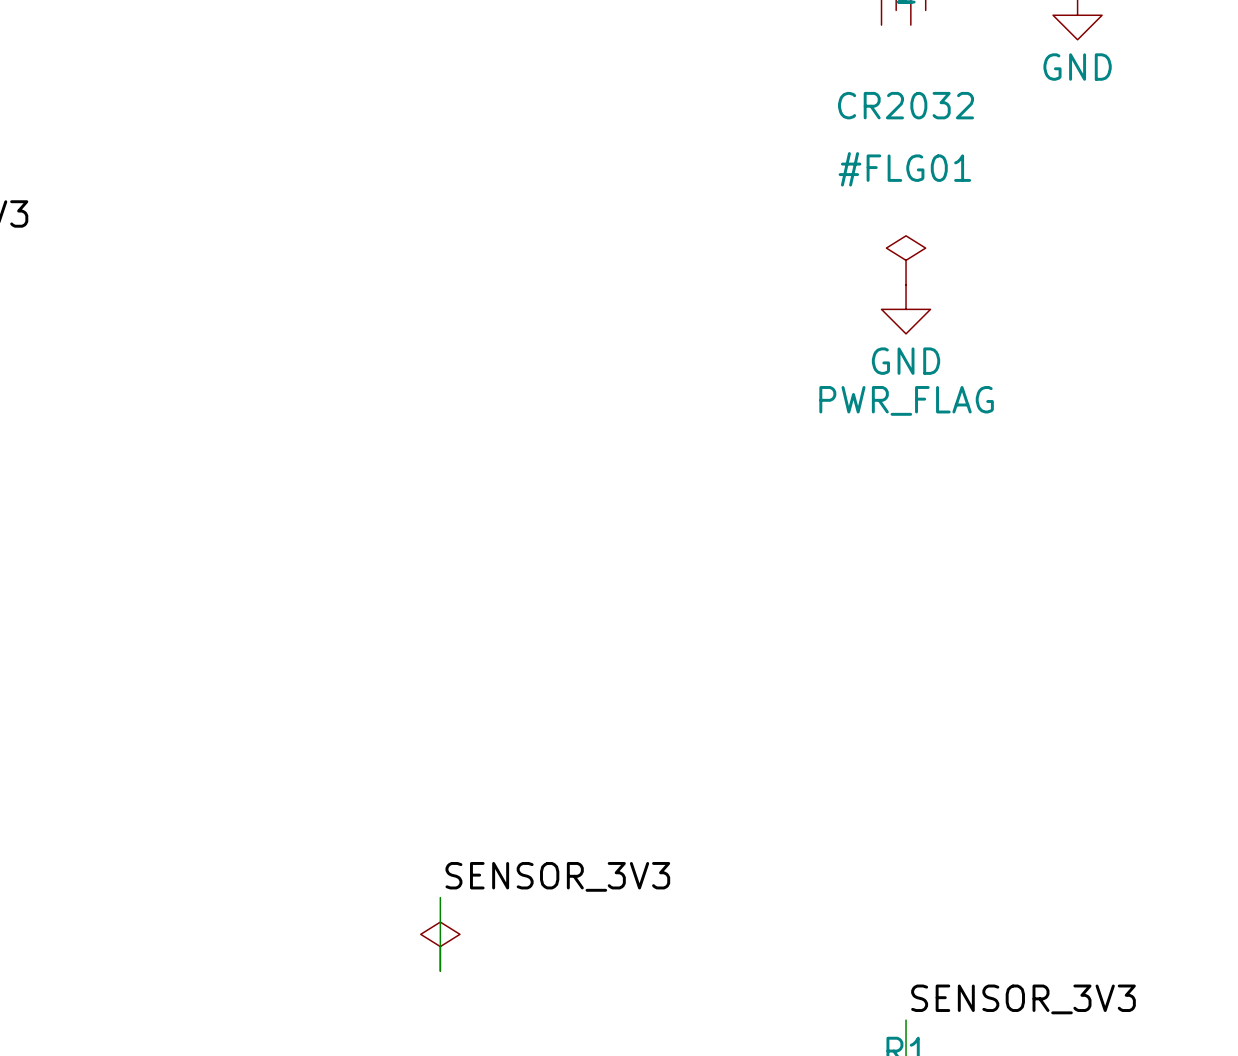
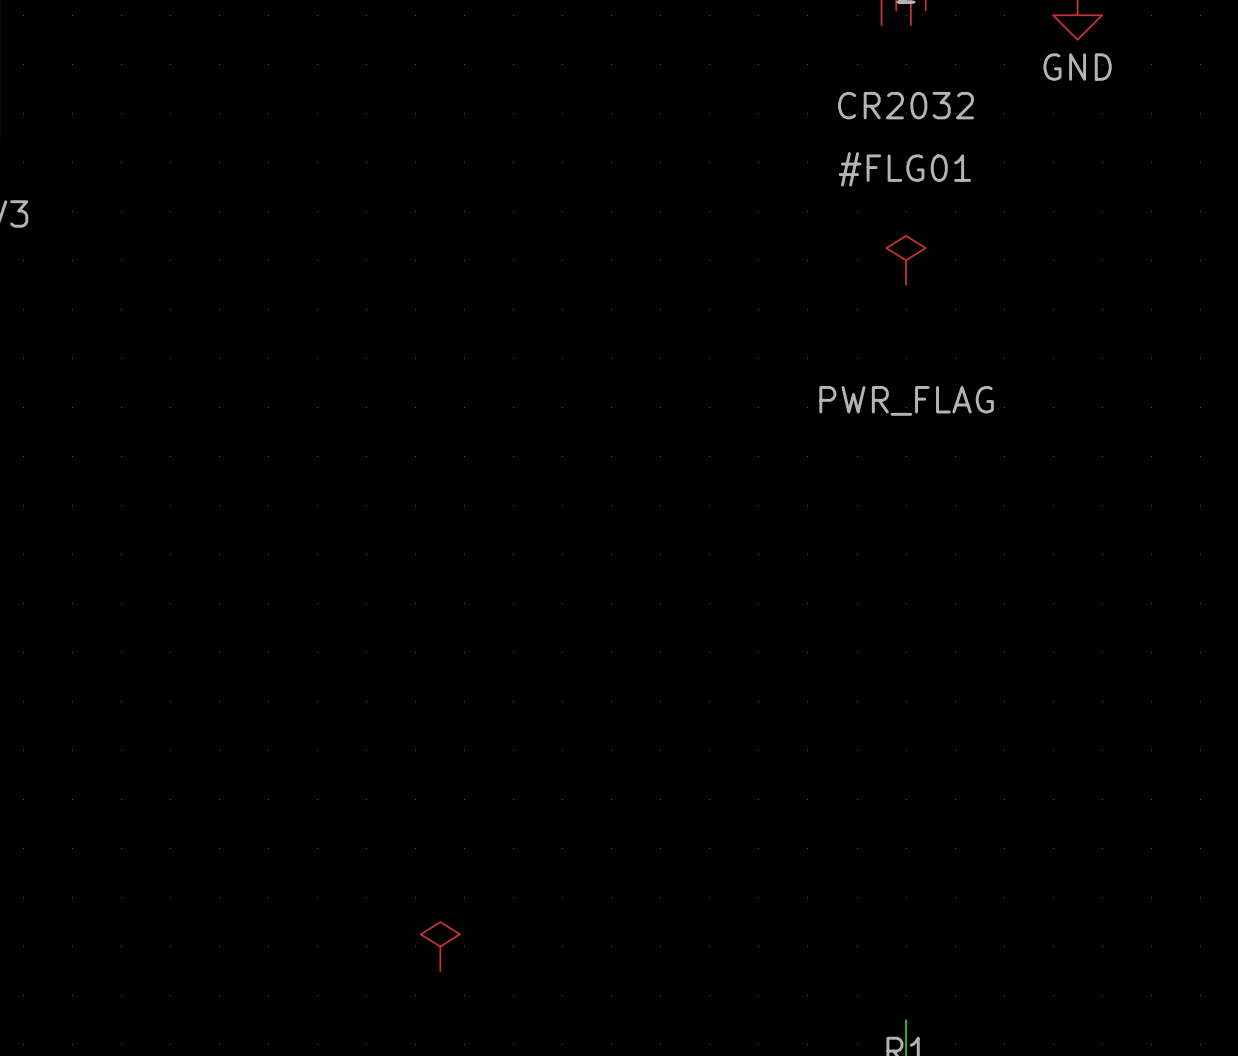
power symbol: GND (906, 309) -> none
label: SENSOR_3V3 (557, 876) -> none
wire: (440, 897) (440, 971) -> none
label: SENSOR_3V3 (1023, 999) -> none

